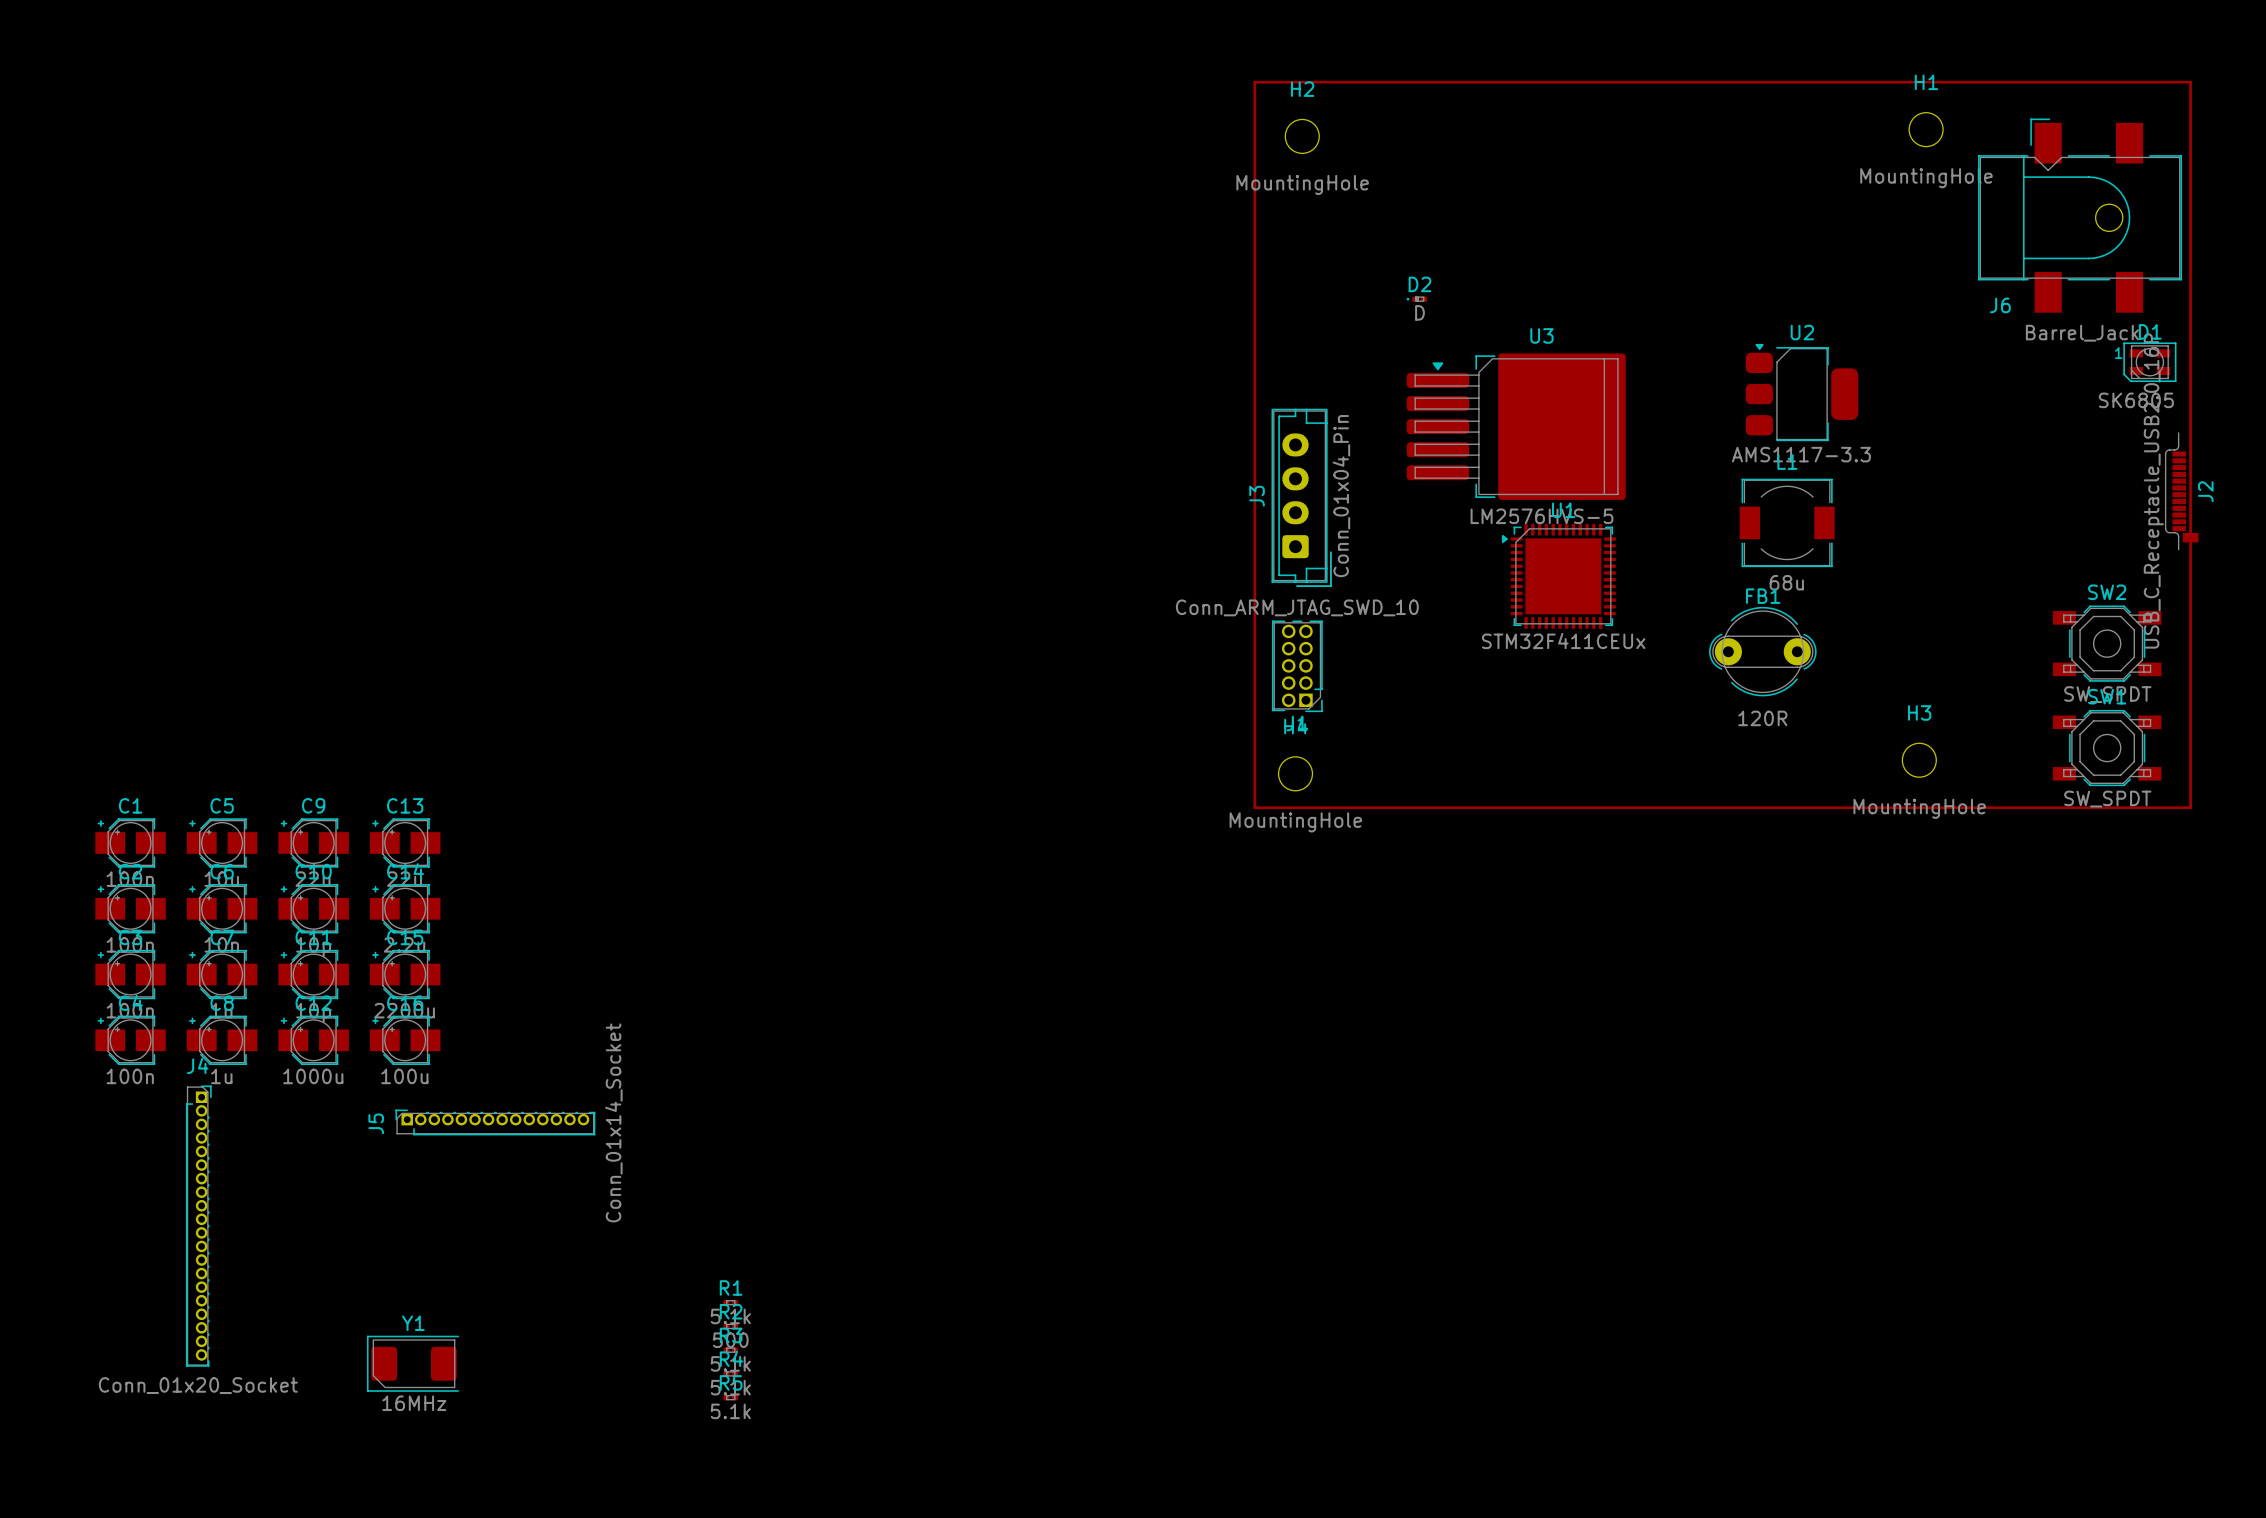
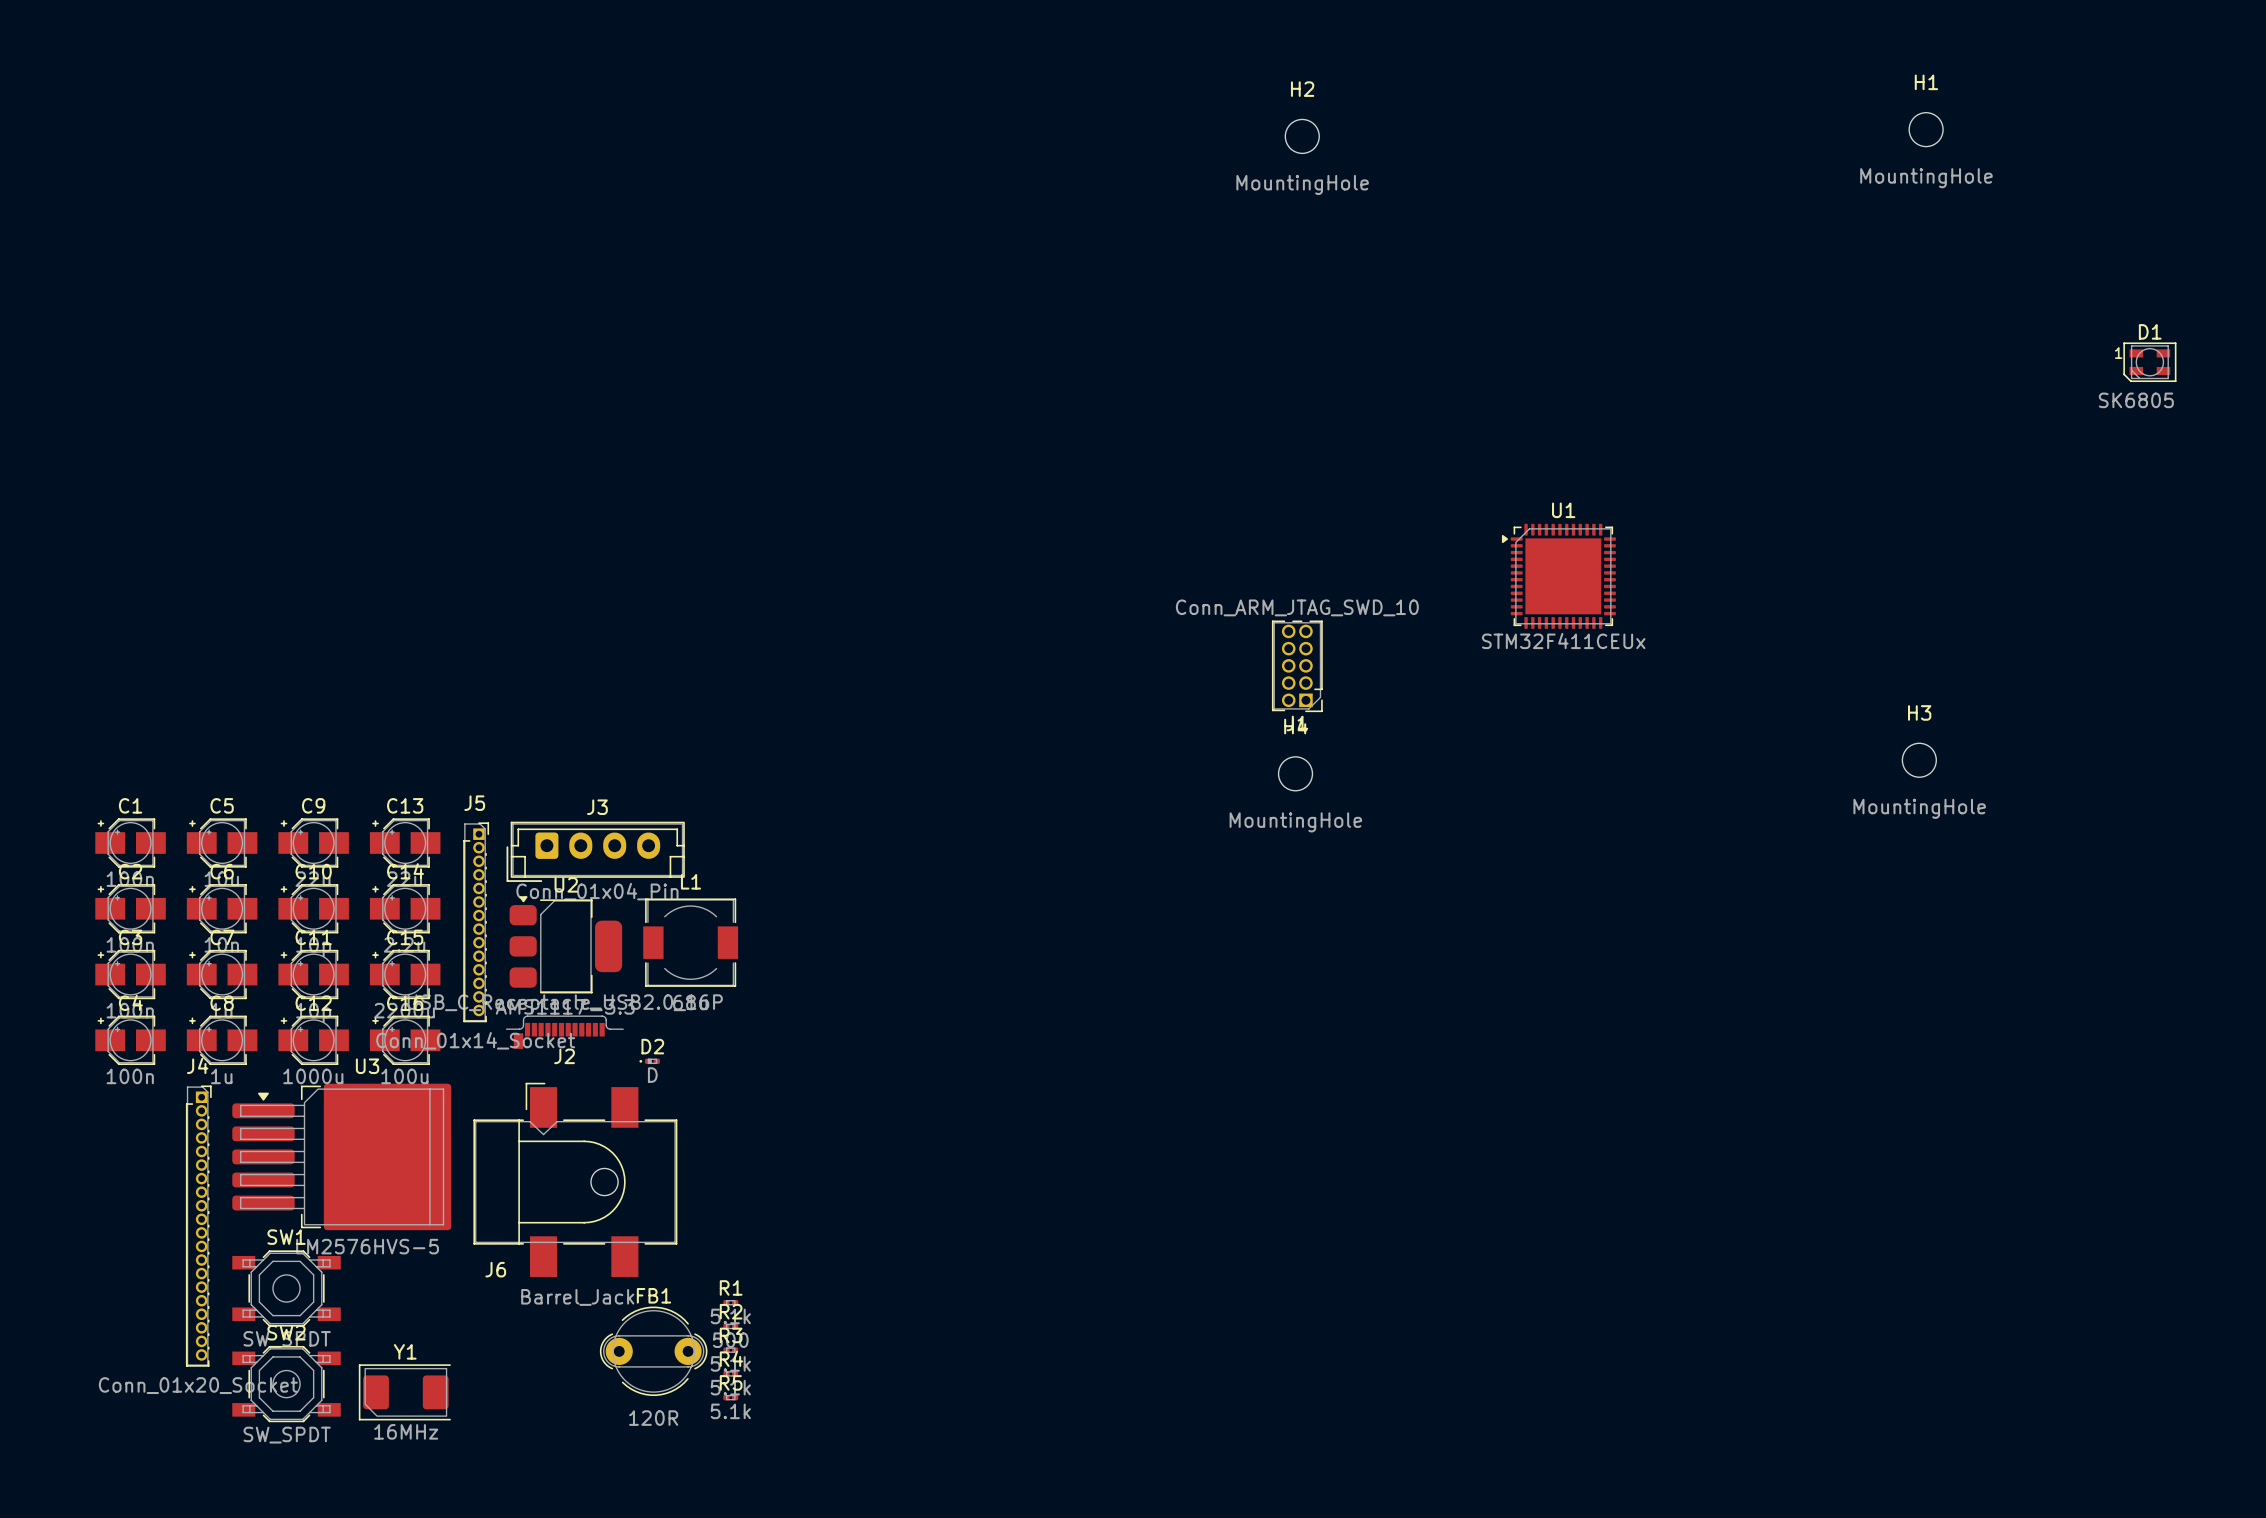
track: (1254, 82) (2190, 82) (2190, 807) (1254, 807) (1254, 82) -> none
J6 position: (2080, 215) -> (575, 1179)
D2 position: (1416, 299) -> (649, 1061)
U2 position: (1802, 392) -> (565, 944)
U3 position: (1516, 426) -> (341, 1156)
J2 rotation: 0° (2181, 491) -> 90° clockwise (564, 1032)
J2 position: (2181, 491) -> (564, 1032)
J3 rotation: 0° (1301, 497) -> 90° clockwise (595, 851)
J3 position: (1301, 497) -> (595, 851)
L1 position: (1787, 522) -> (690, 942)
SW2 position: (2107, 643) -> (286, 1384)
FB1 position: (1762, 651) -> (653, 1351)
SW1 position: (2107, 748) -> (286, 1288)
J5 rotation: 0° (495, 1122) -> 90° clockwise (476, 922)
J5 position: (495, 1122) -> (476, 922)
Y1 position: (412, 1363) -> (404, 1392)

